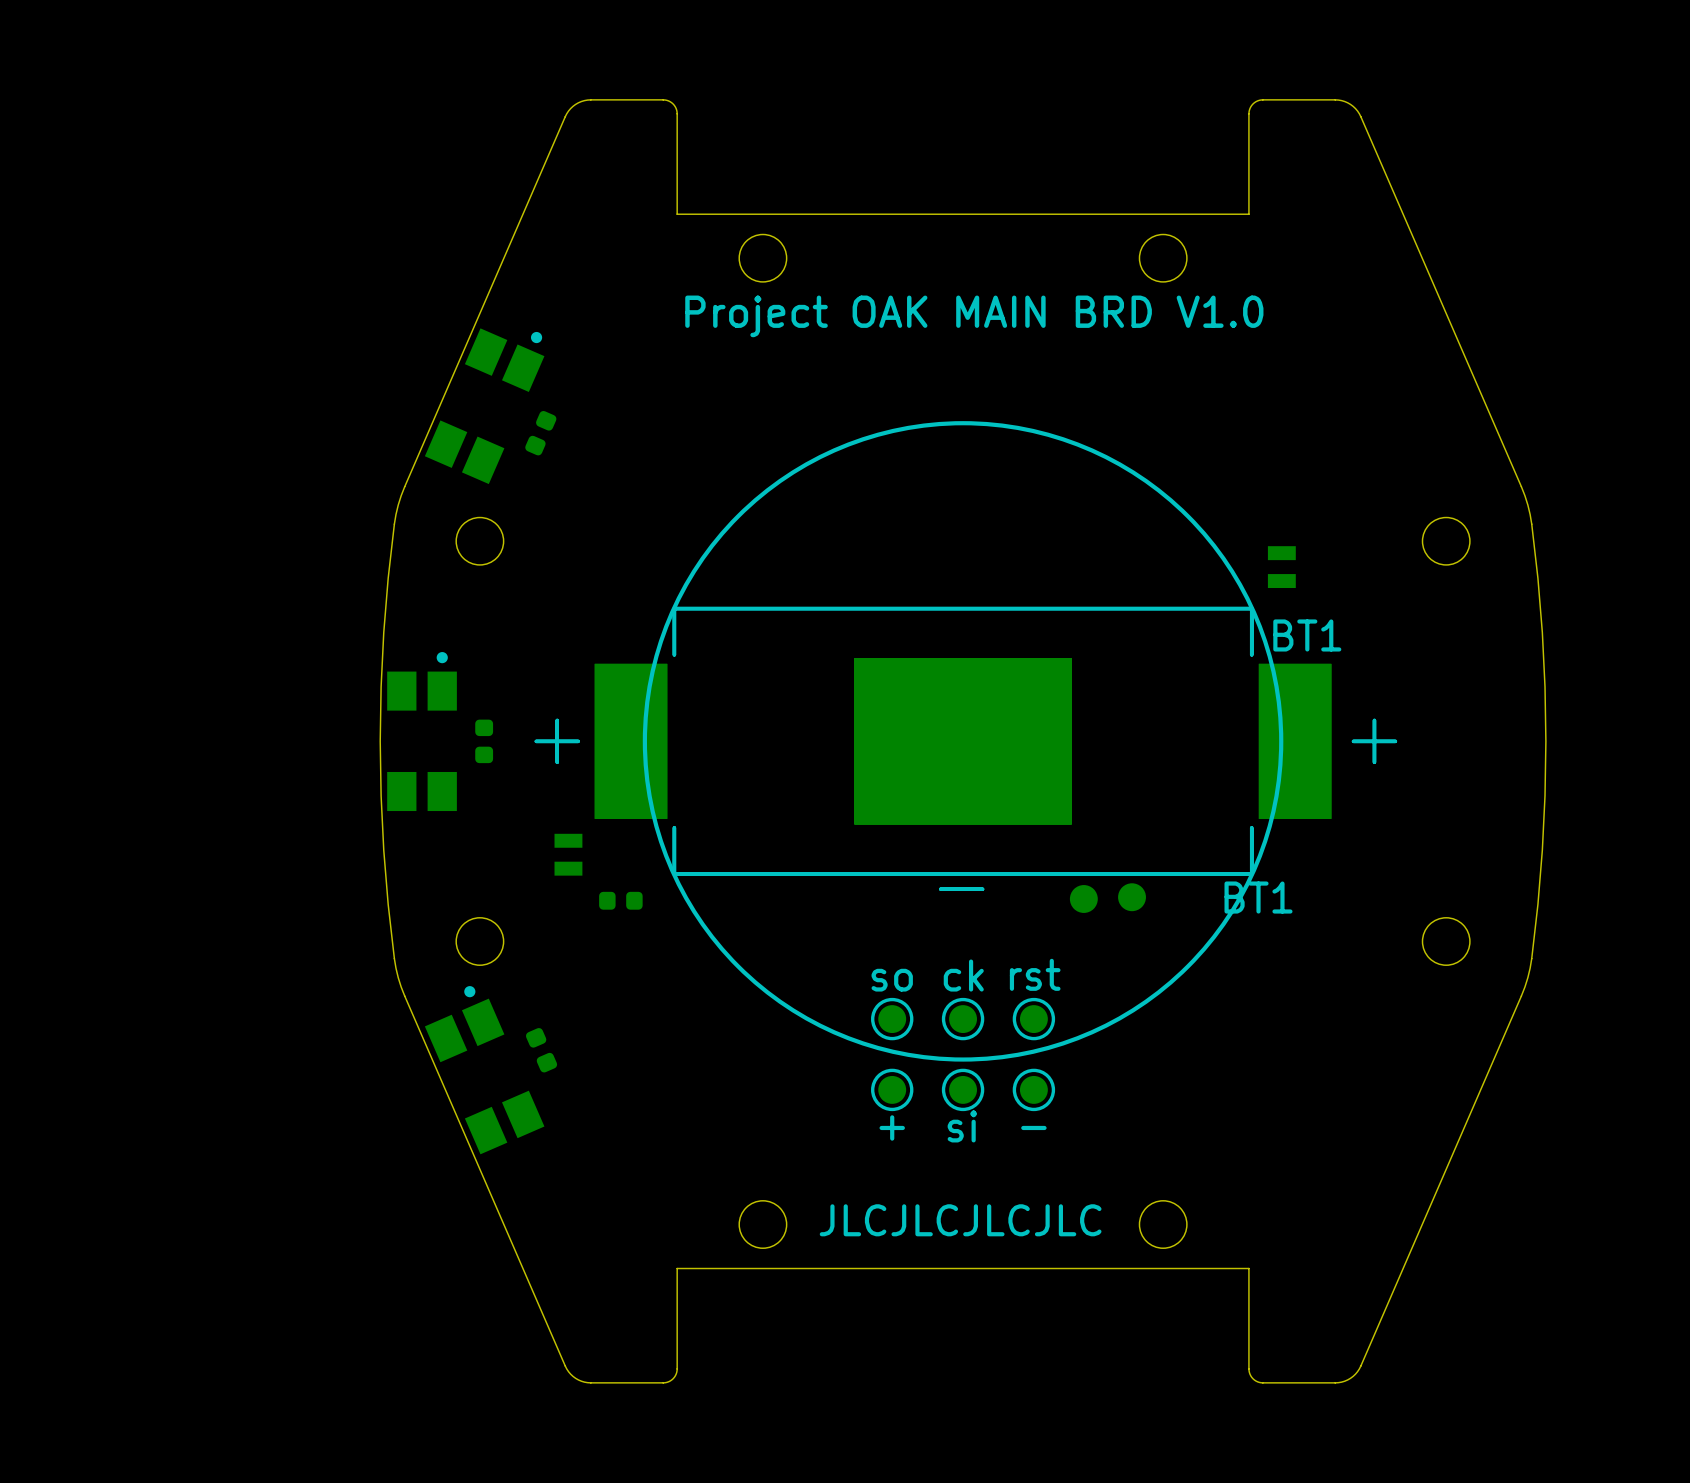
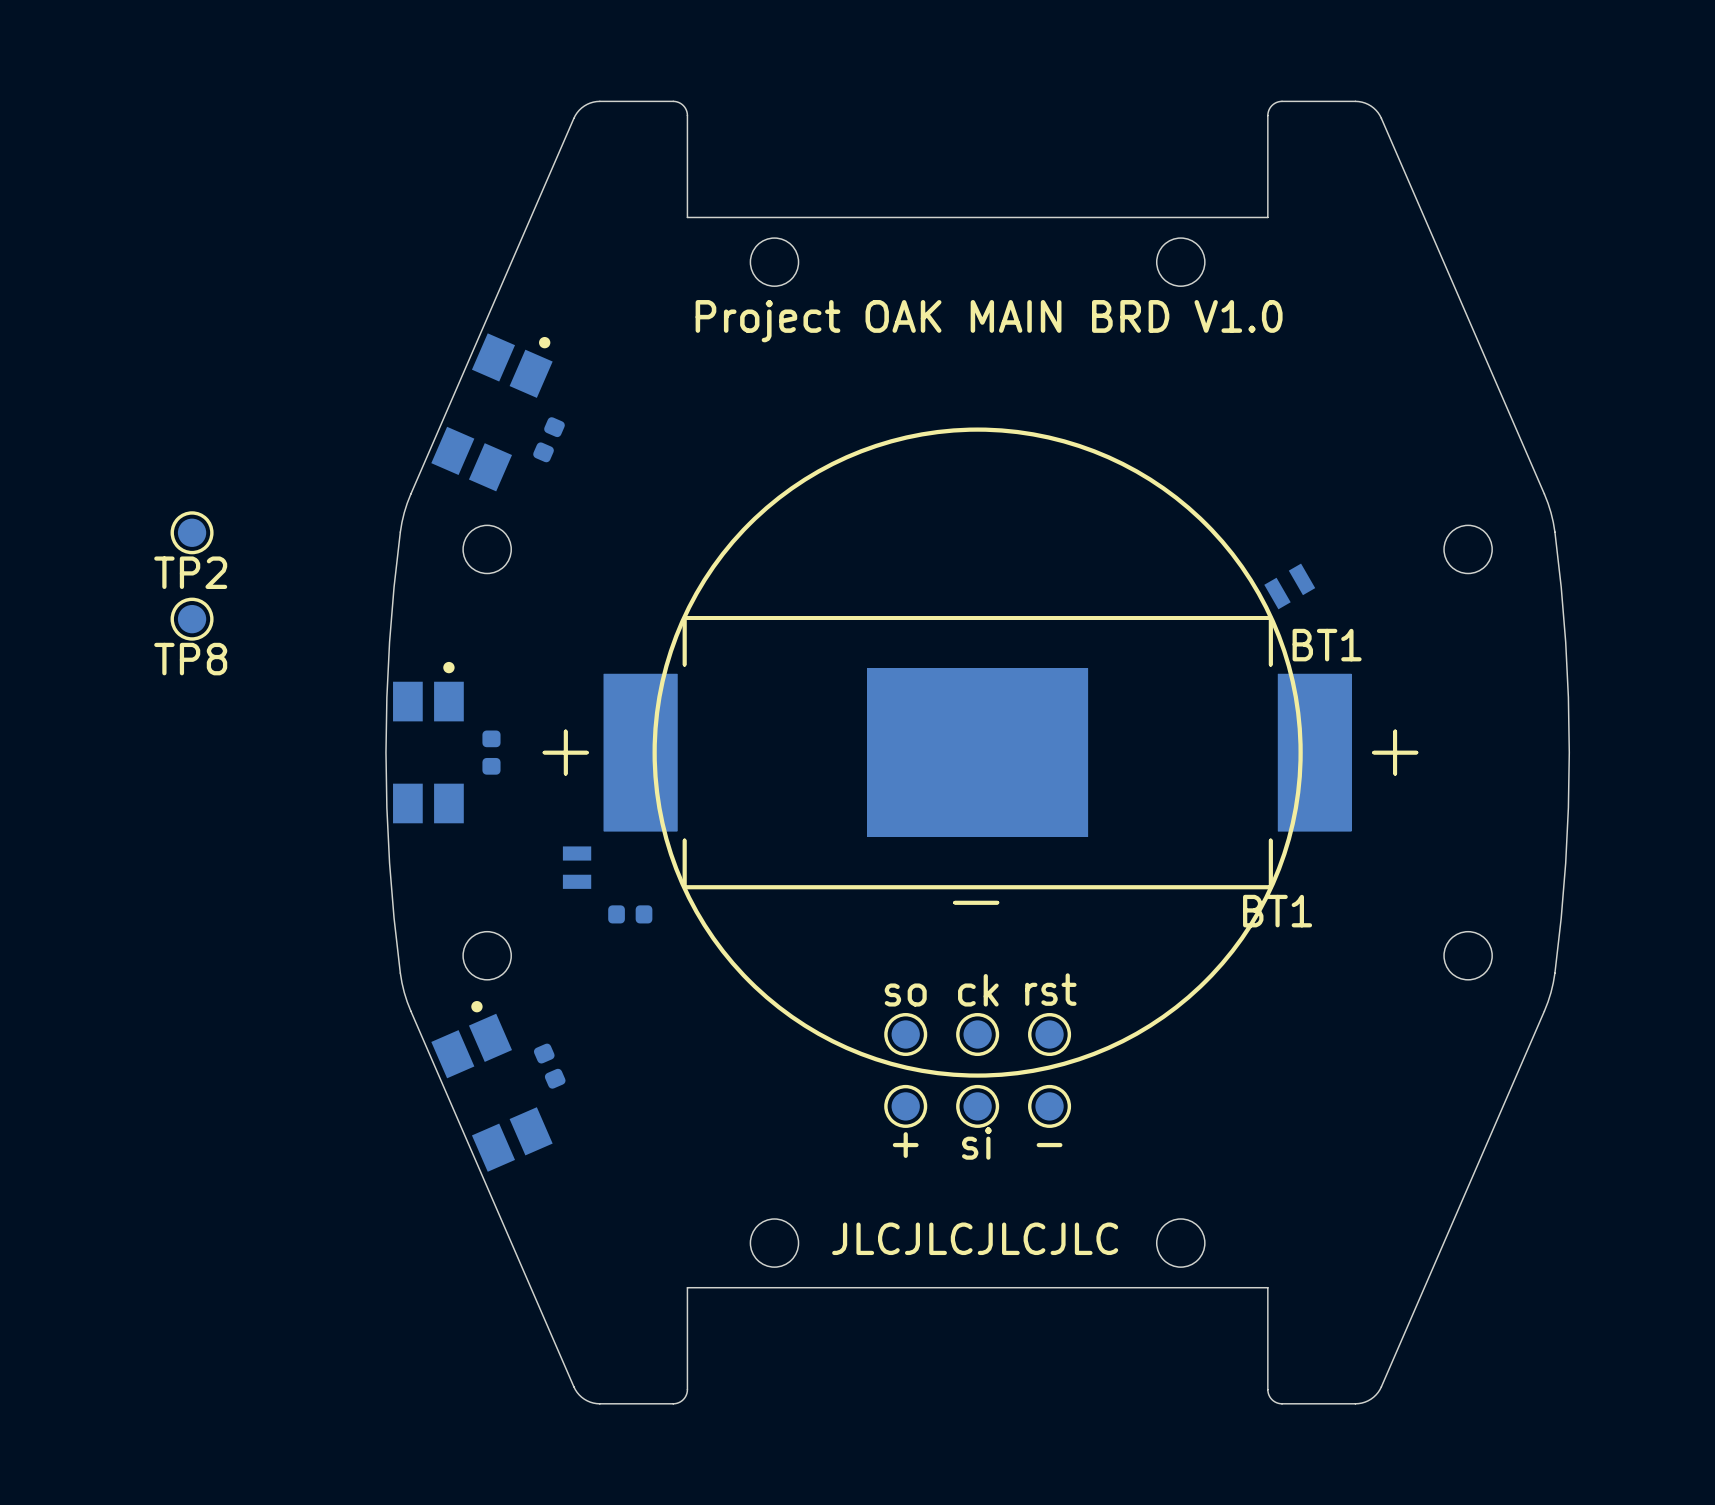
TP2: none -> (192, 532)
part rotation: 0° (1281, 567) -> 60° clockwise (1289, 586)
TP8: none -> (192, 619)
part: (1132, 897) -> none
part: (1083, 898) -> none

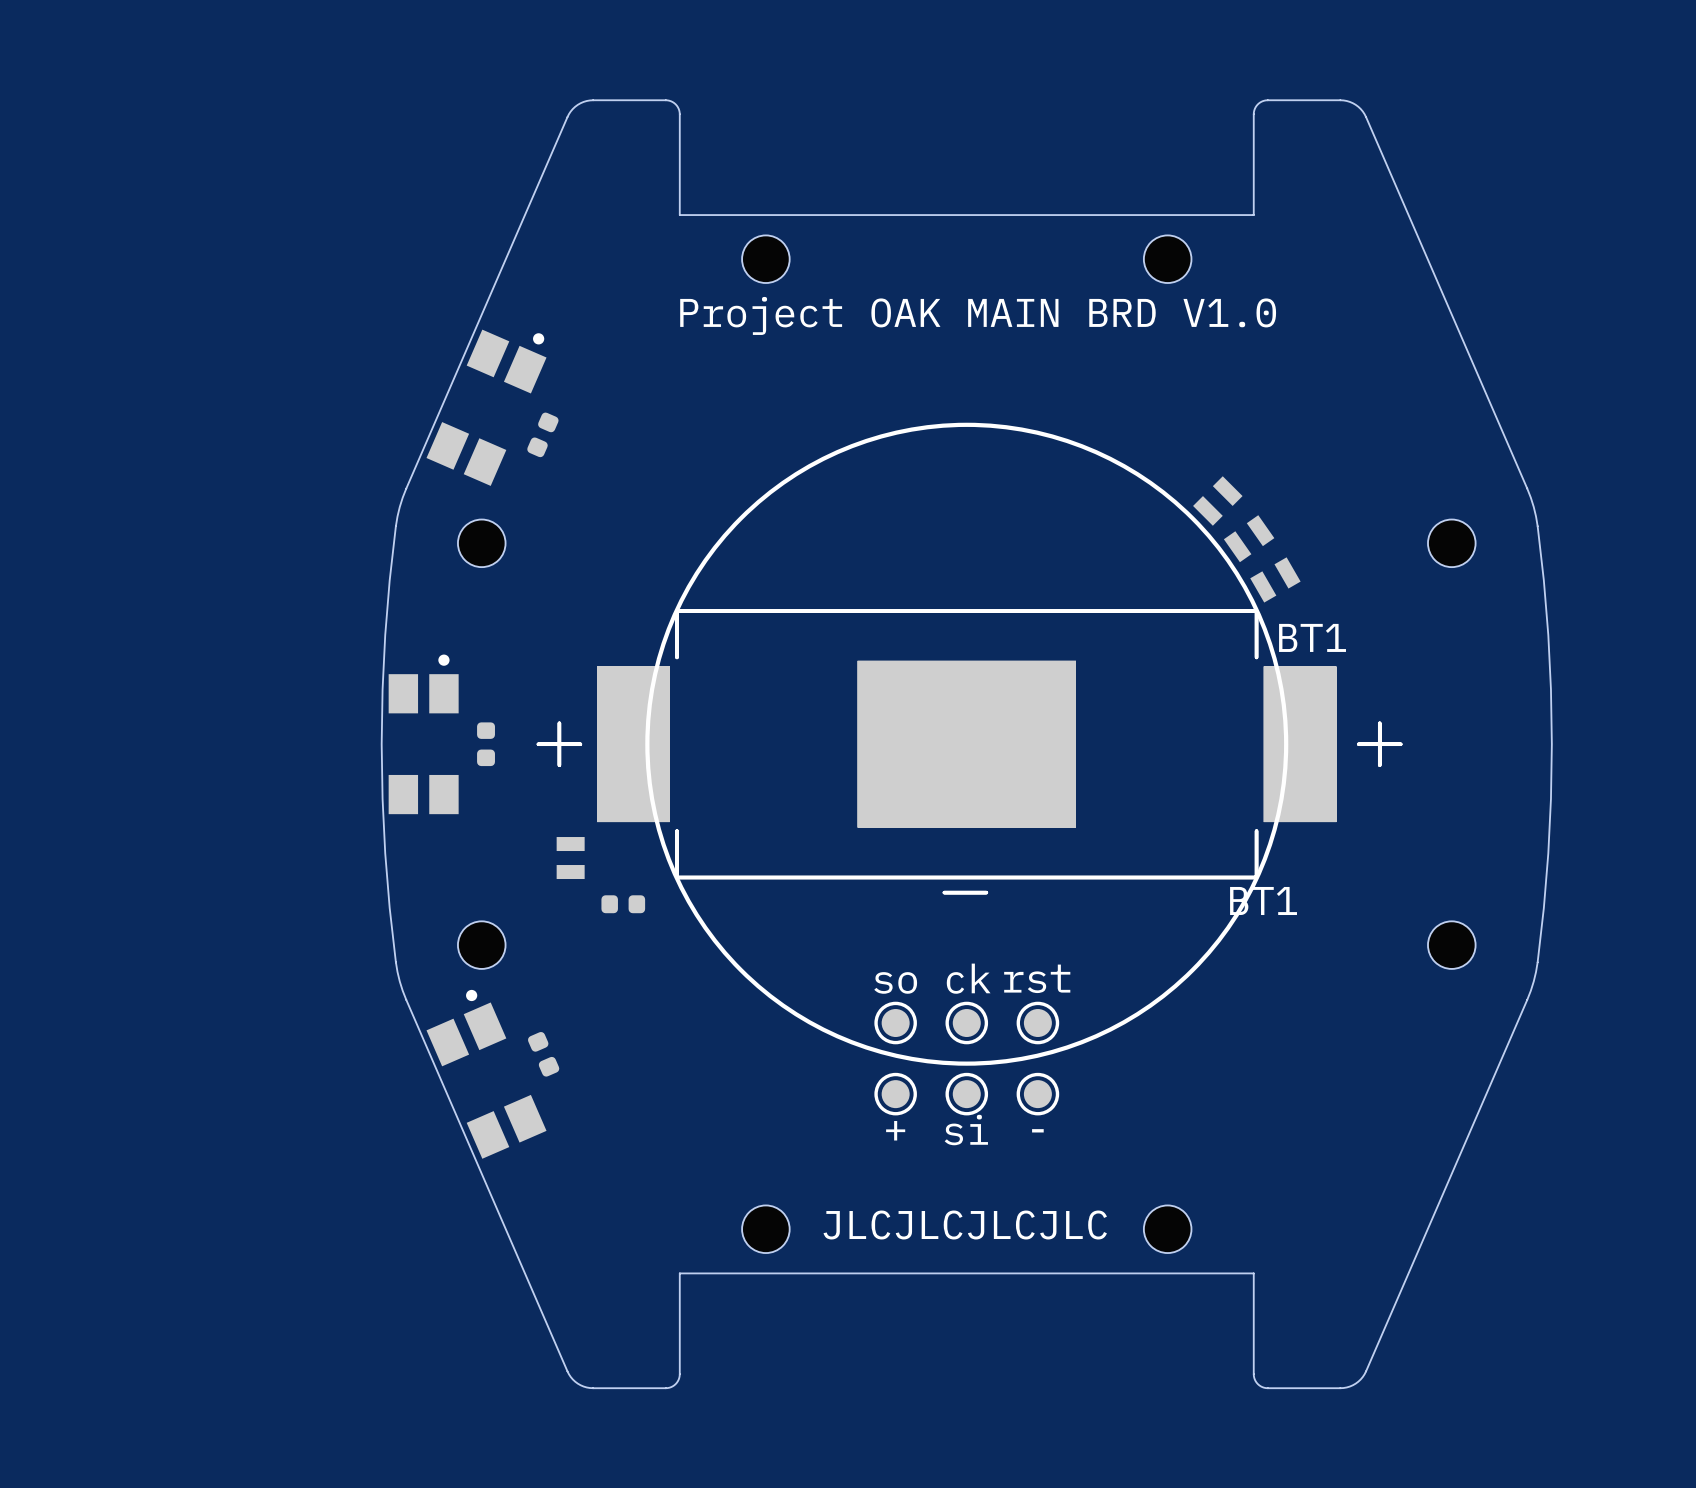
part: none -> (1217, 501)
TP2: (192, 532) -> none
part: none -> (1249, 538)
TP8: (192, 619) -> none

